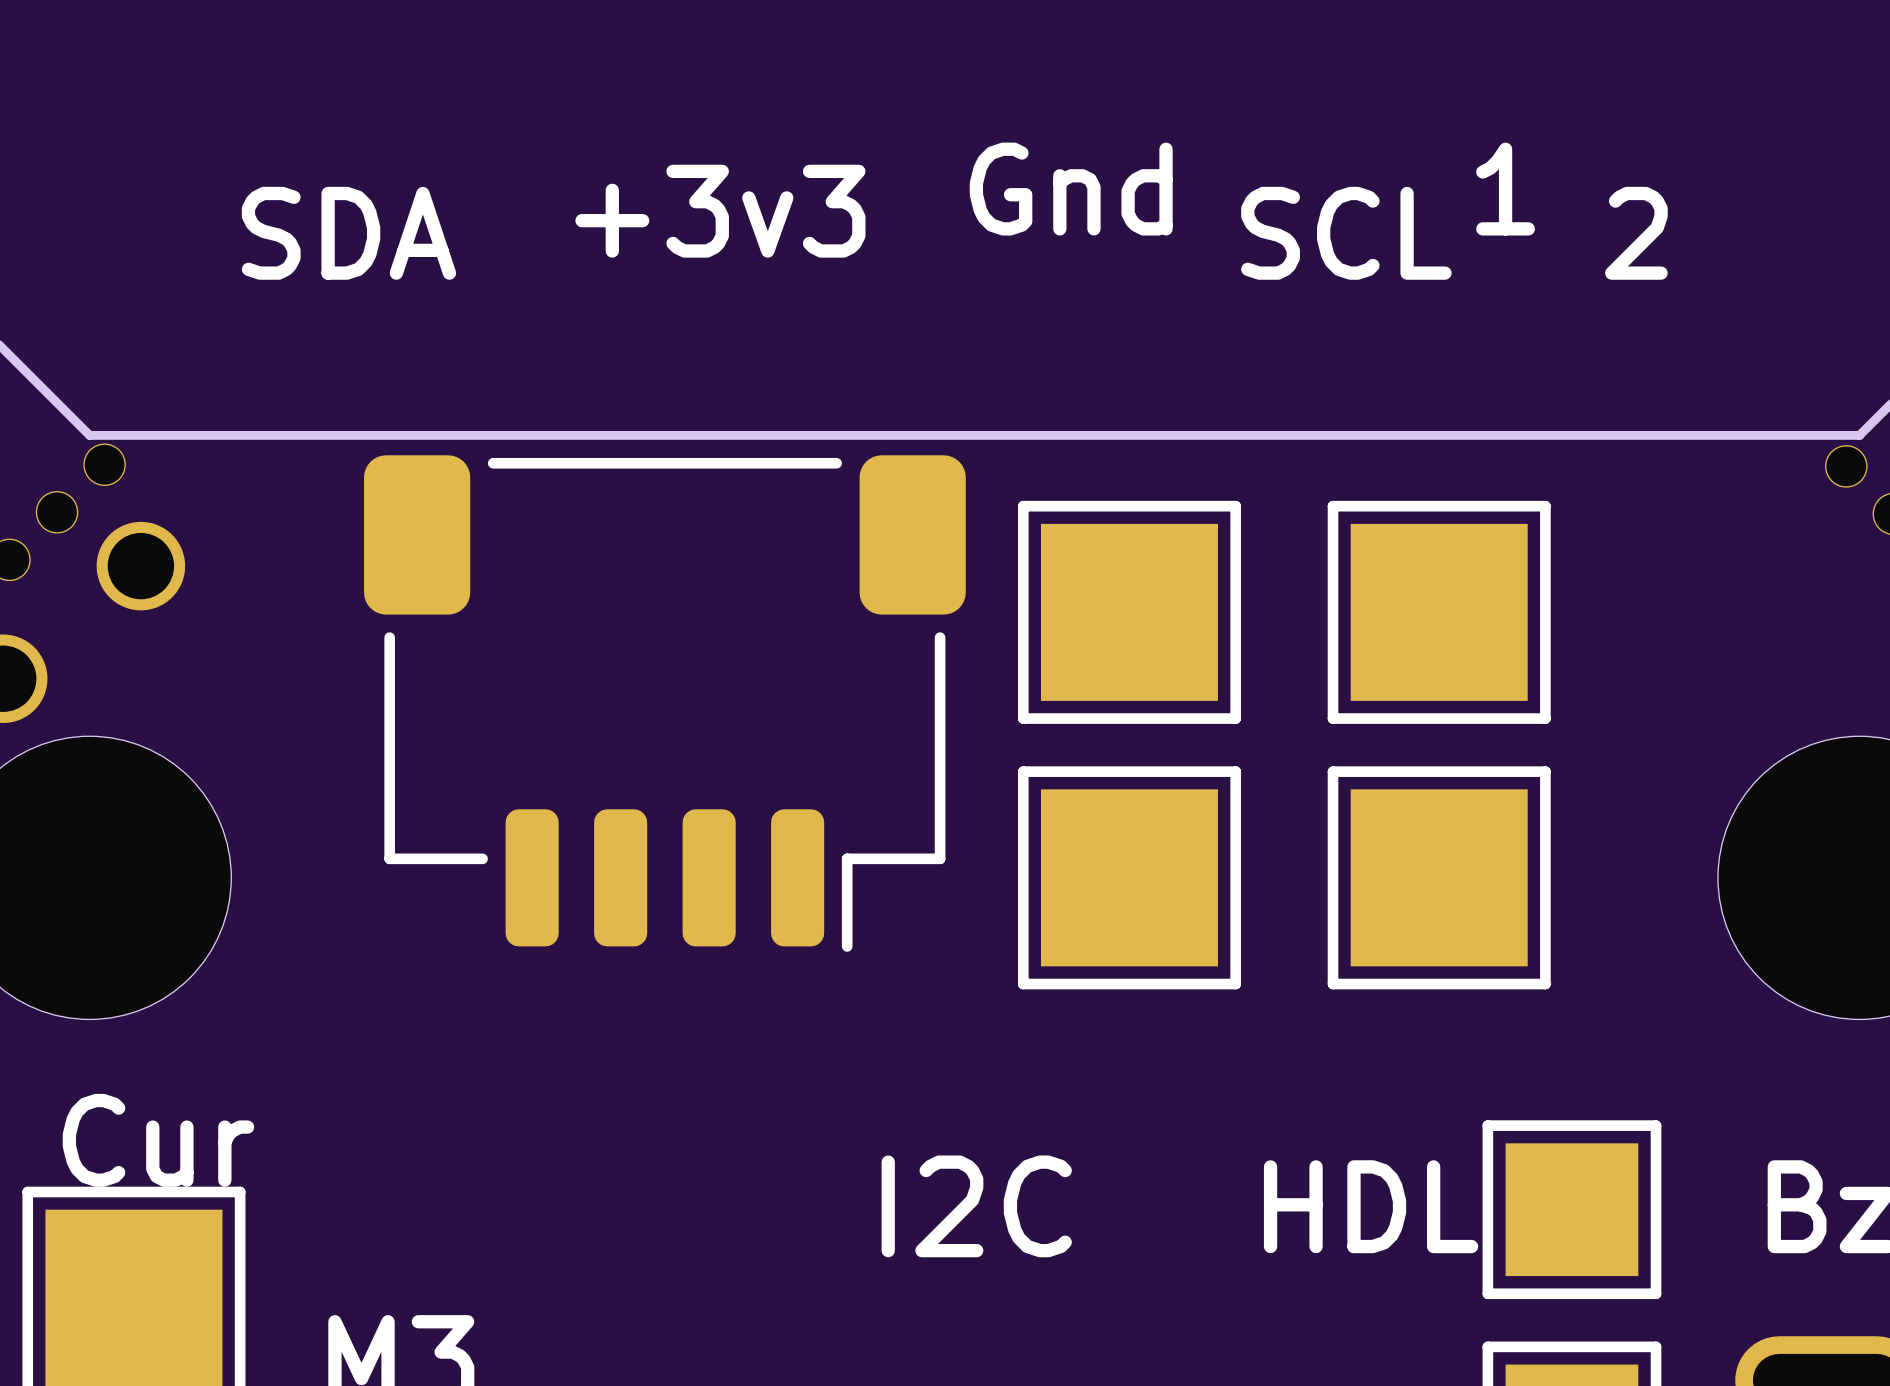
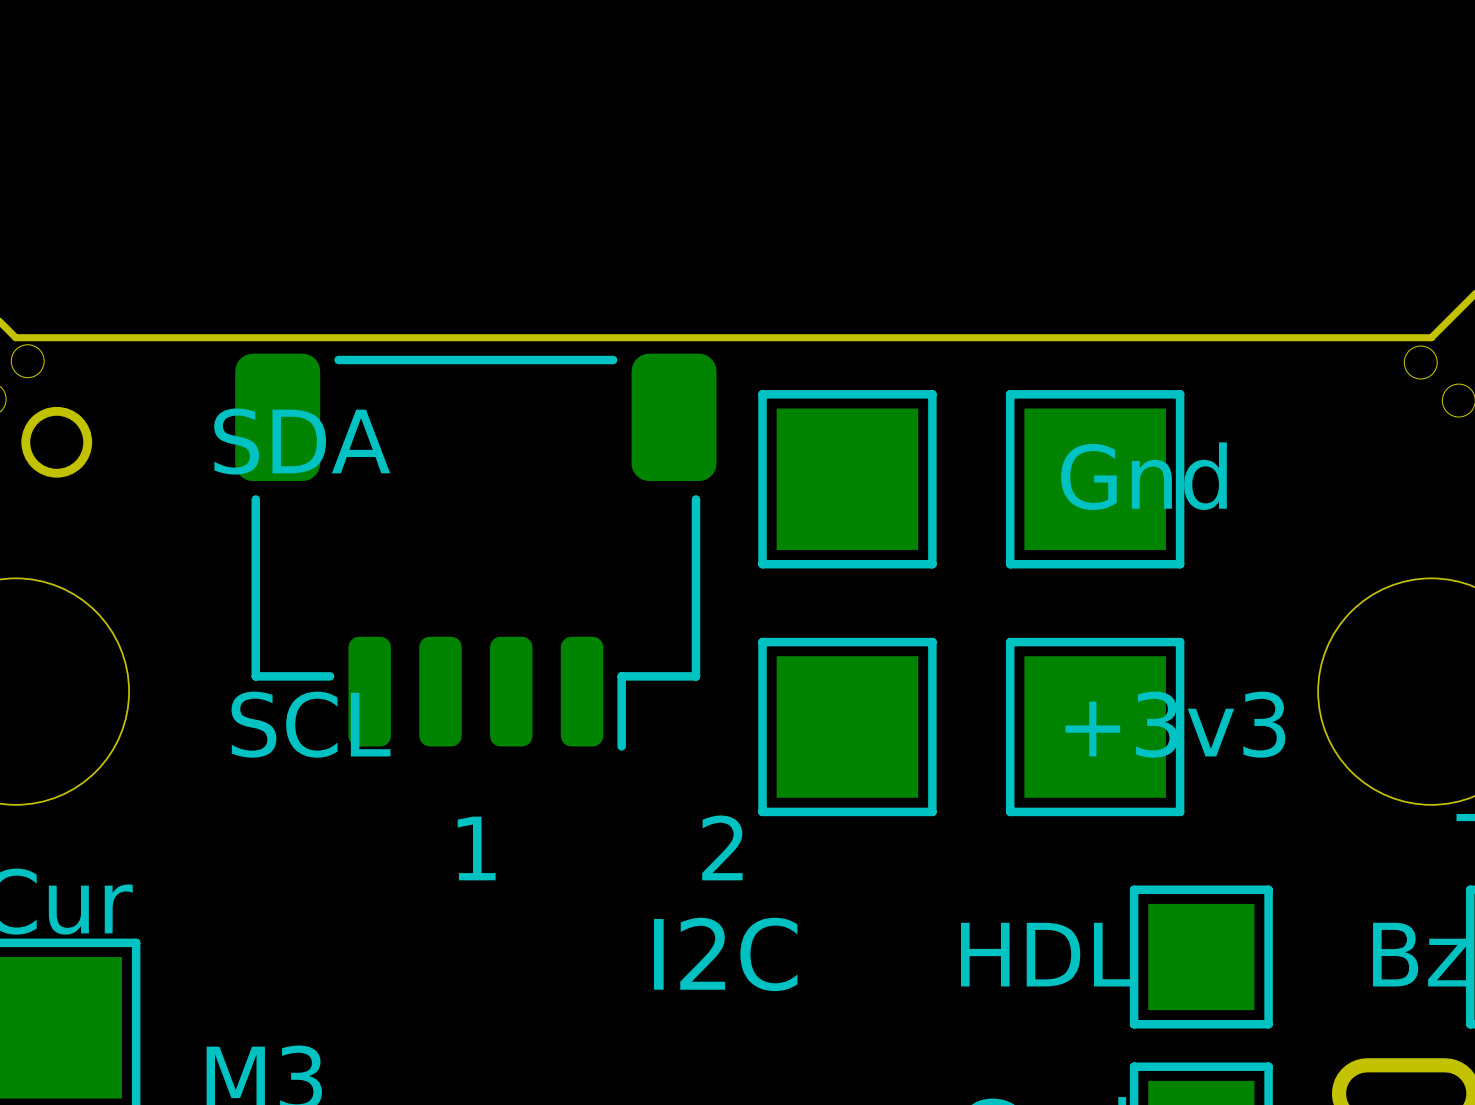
text position: Gnd (1071, 189) -> Gnd (1143, 476)
text position: 1 (1505, 189) -> 1 (476, 848)
text position: +3v3 (720, 211) -> +3v3 (1175, 724)
text position: SDA (348, 233) -> SDA (302, 441)
text position: SCL (1346, 233) -> SCL (311, 724)
text position: 2 (1636, 233) -> 2 (722, 847)
part position: (1129, 877) -> (847, 726)
part position: (1439, 877) -> (1095, 726)

